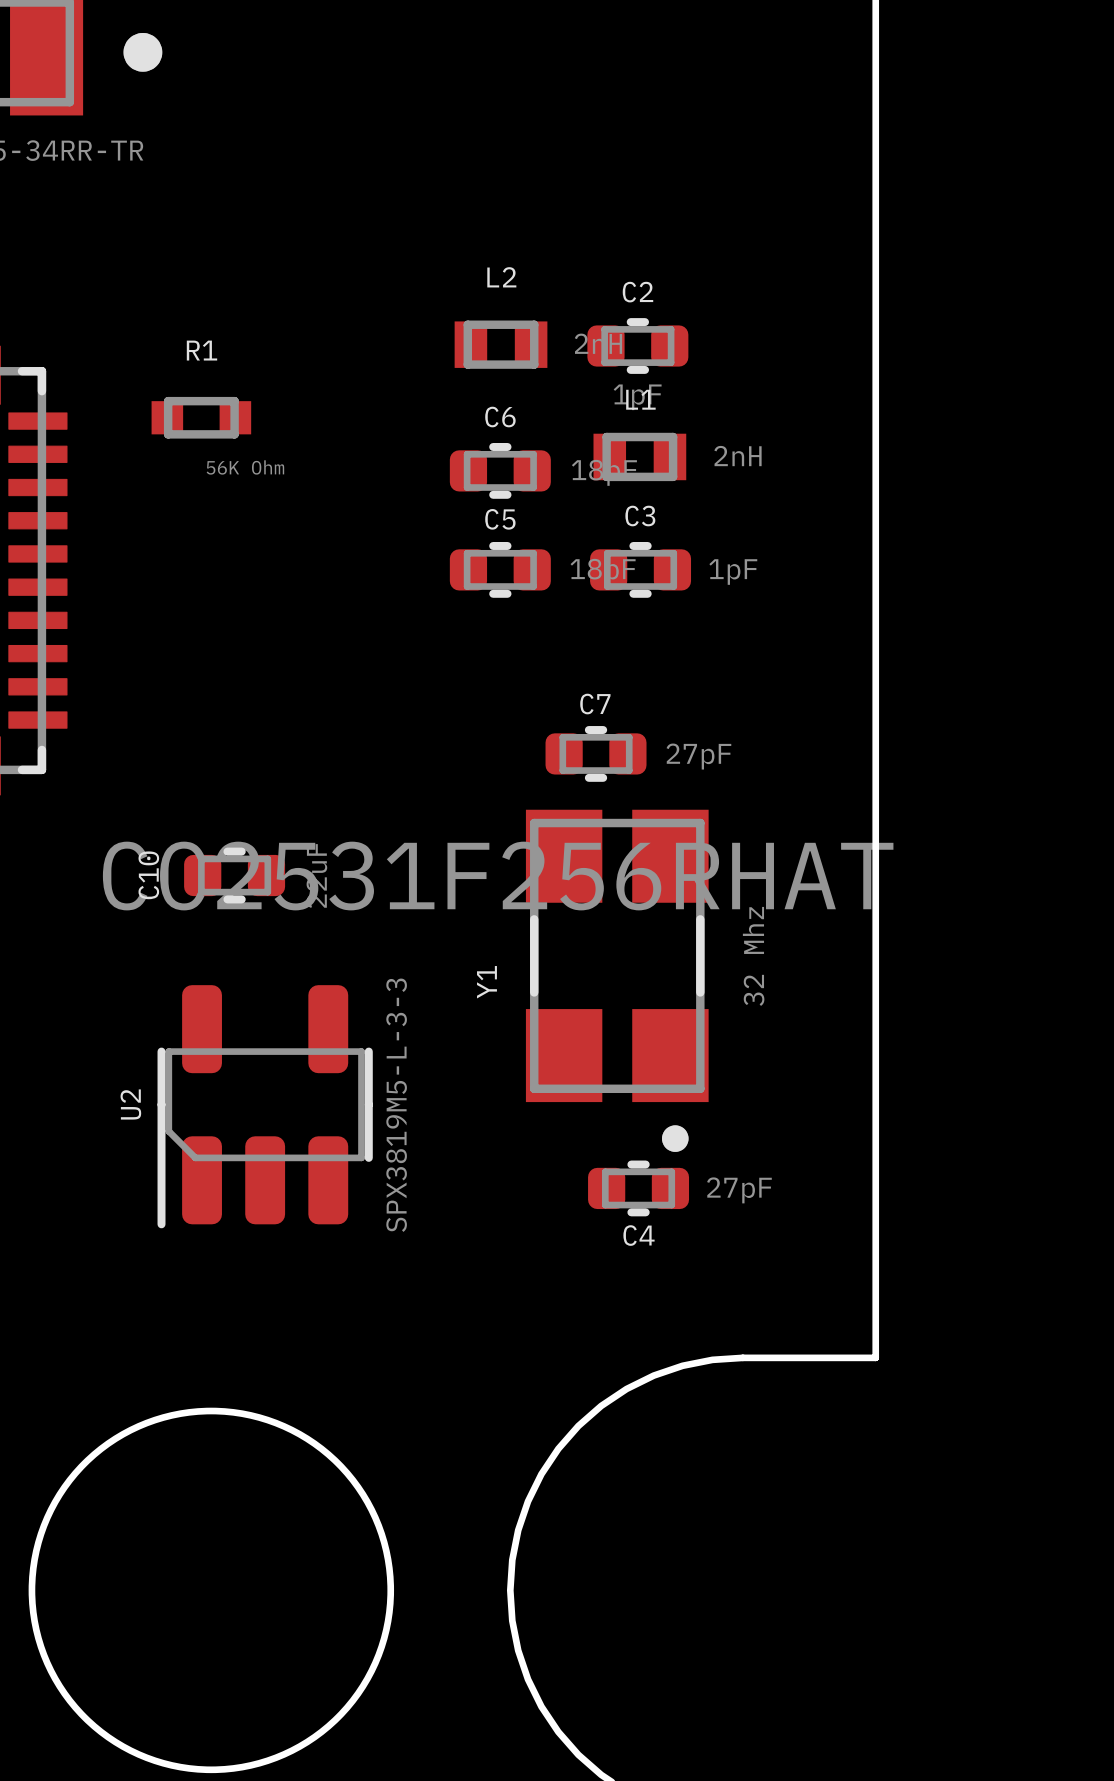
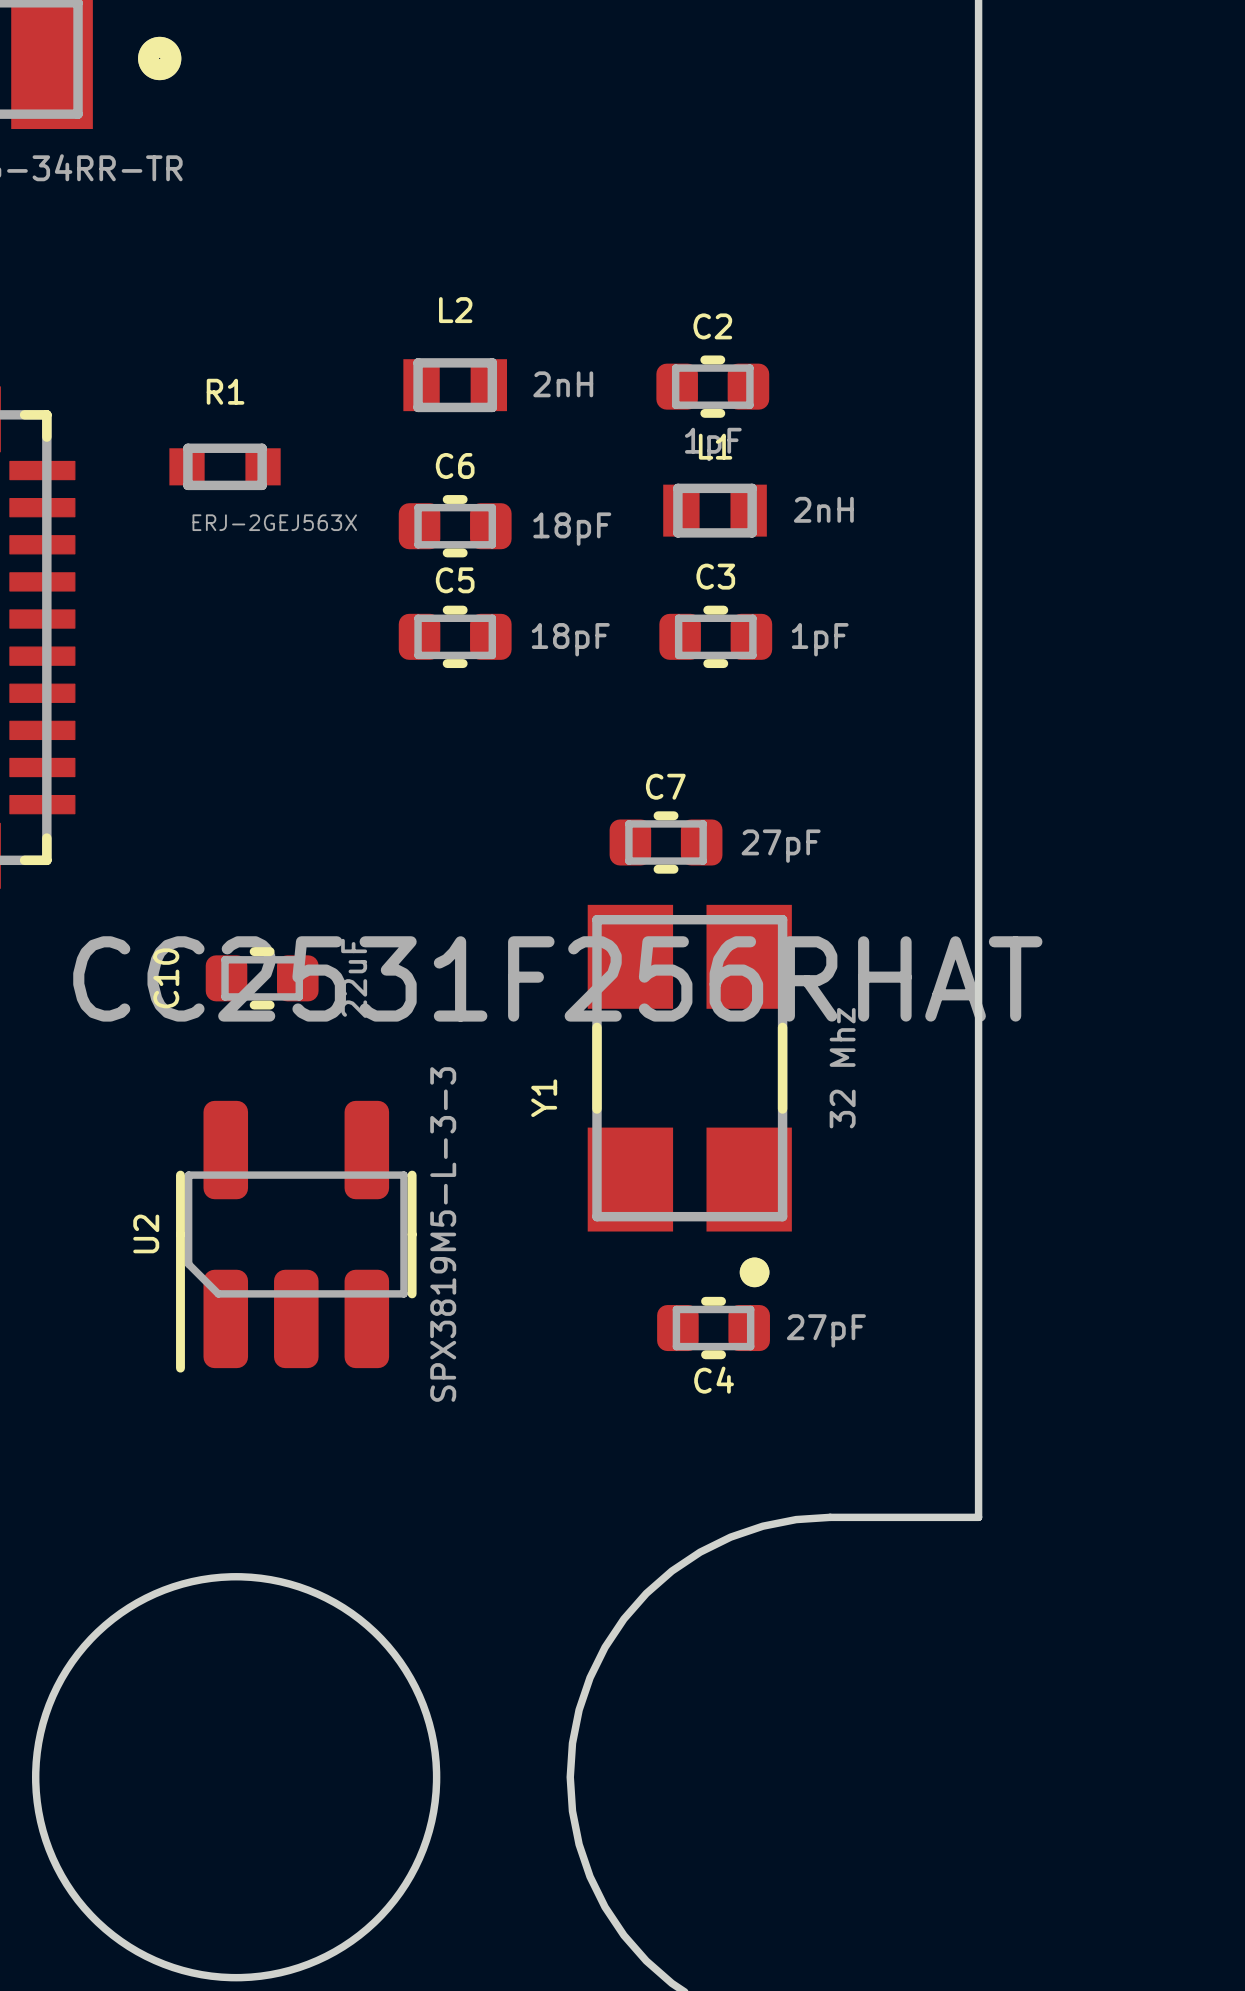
L2 position: (501, 344) -> (455, 385)
R1 value: 56K Ohm (245, 467) -> ERJ-2GEJ563X (274, 522)
C6 position: (500, 470) -> (455, 526)
C5 position: (500, 569) -> (455, 636)

